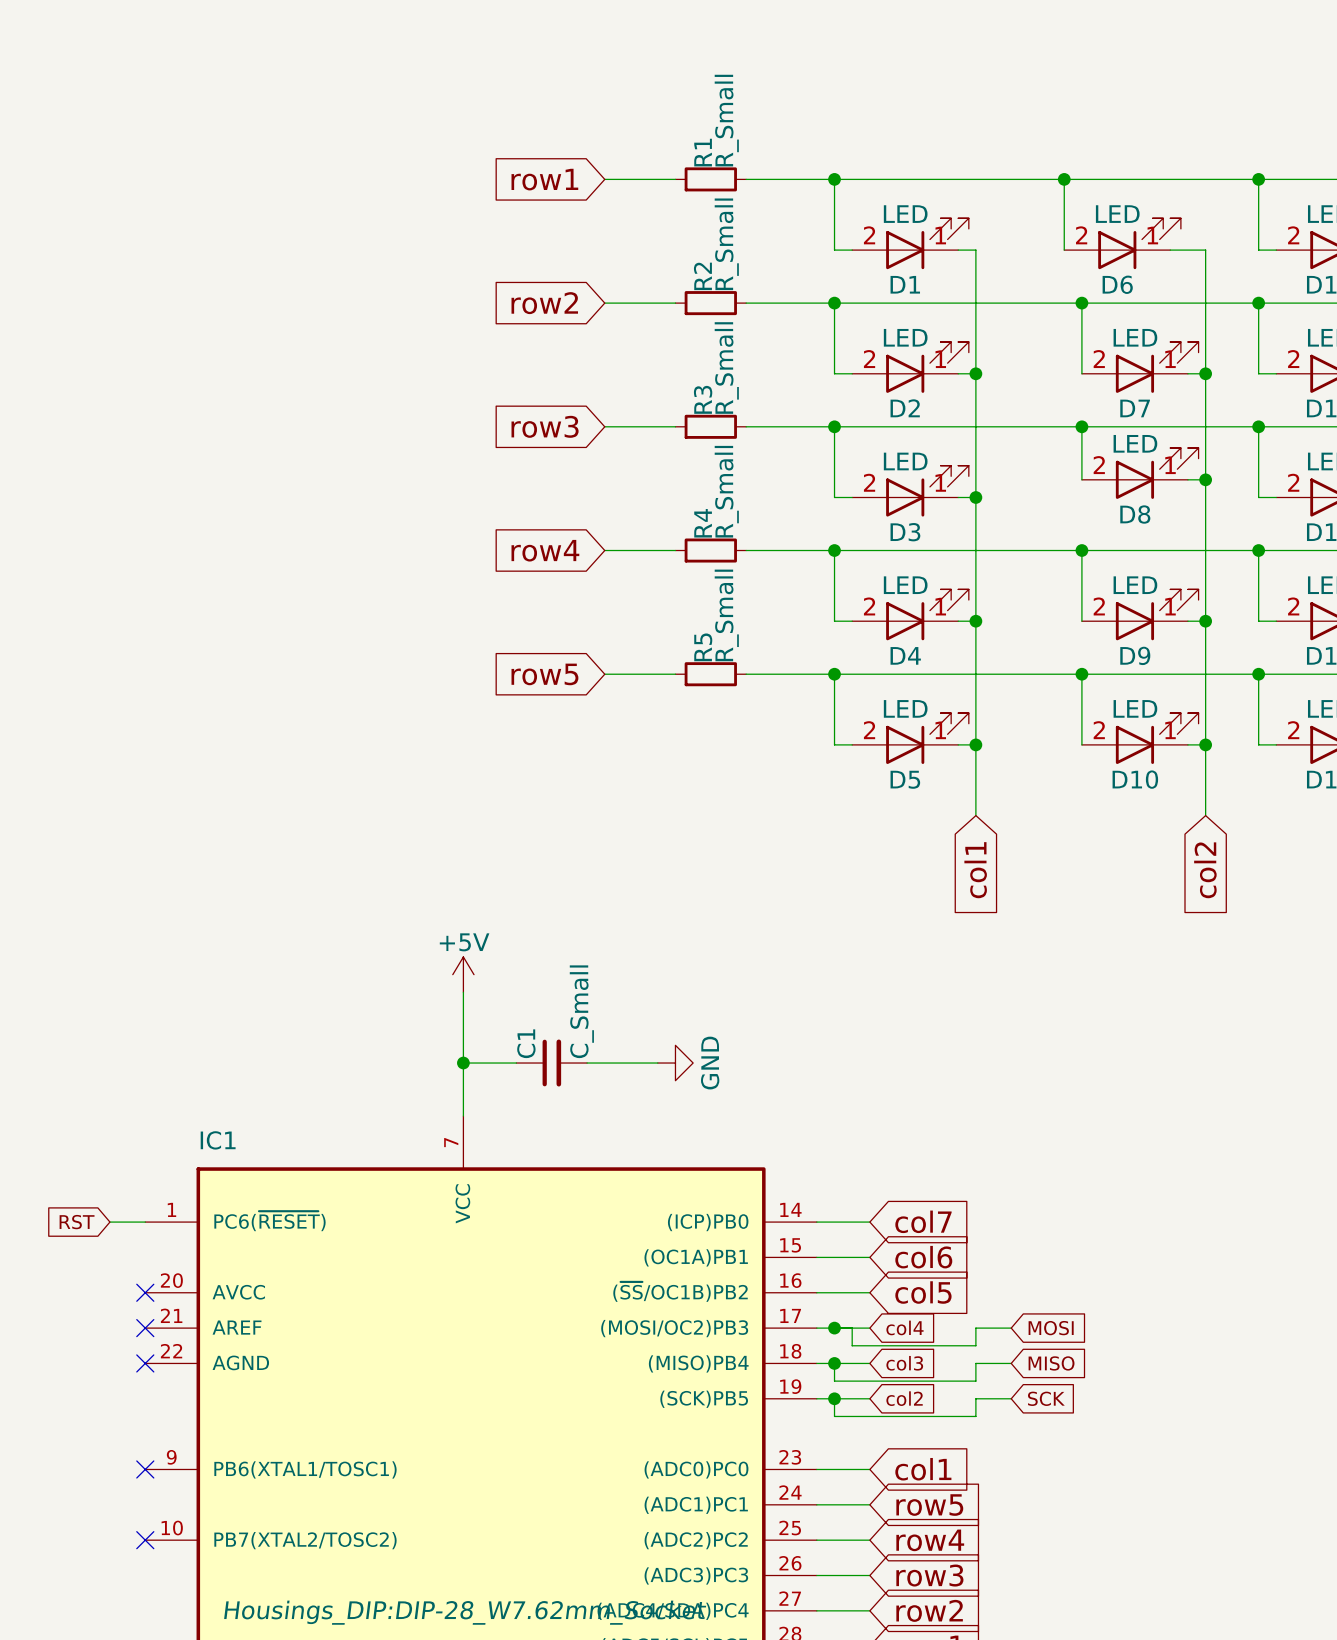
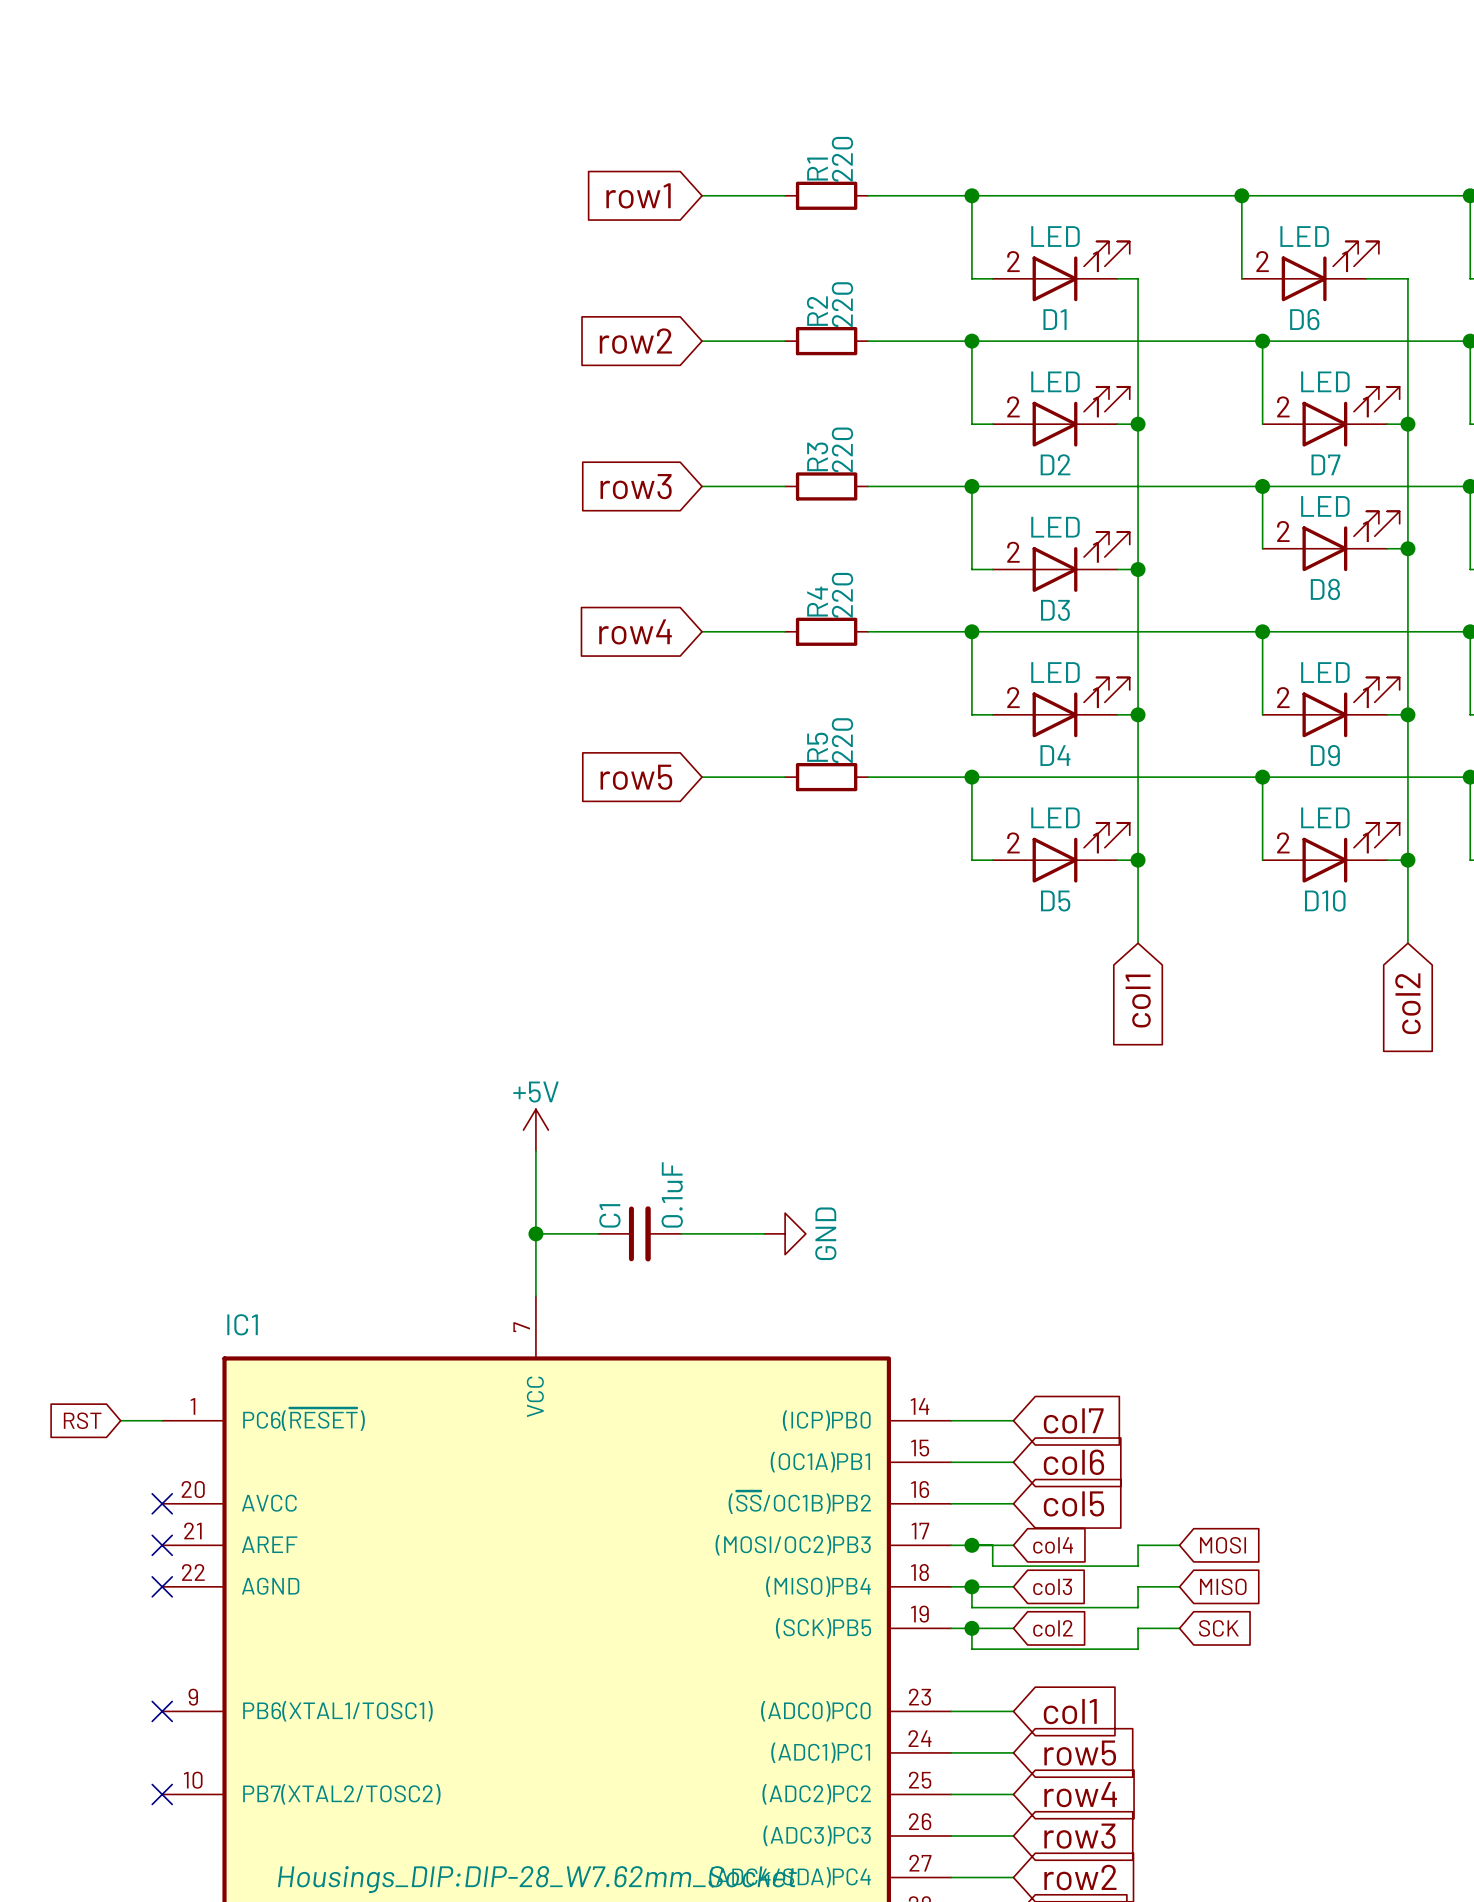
R1 value: R_Small (726, 120) -> 220 (842, 159)
R2 value: R_Small (726, 244) -> 220 (842, 304)
R3 value: R_Small (726, 368) -> 220 (842, 449)
R4 value: R_Small (726, 491) -> 220 (842, 595)
R5 value: R_Small (726, 615) -> 220 (842, 740)
C1 value: C_Small (581, 1011) -> 0.1uF (672, 1194)

